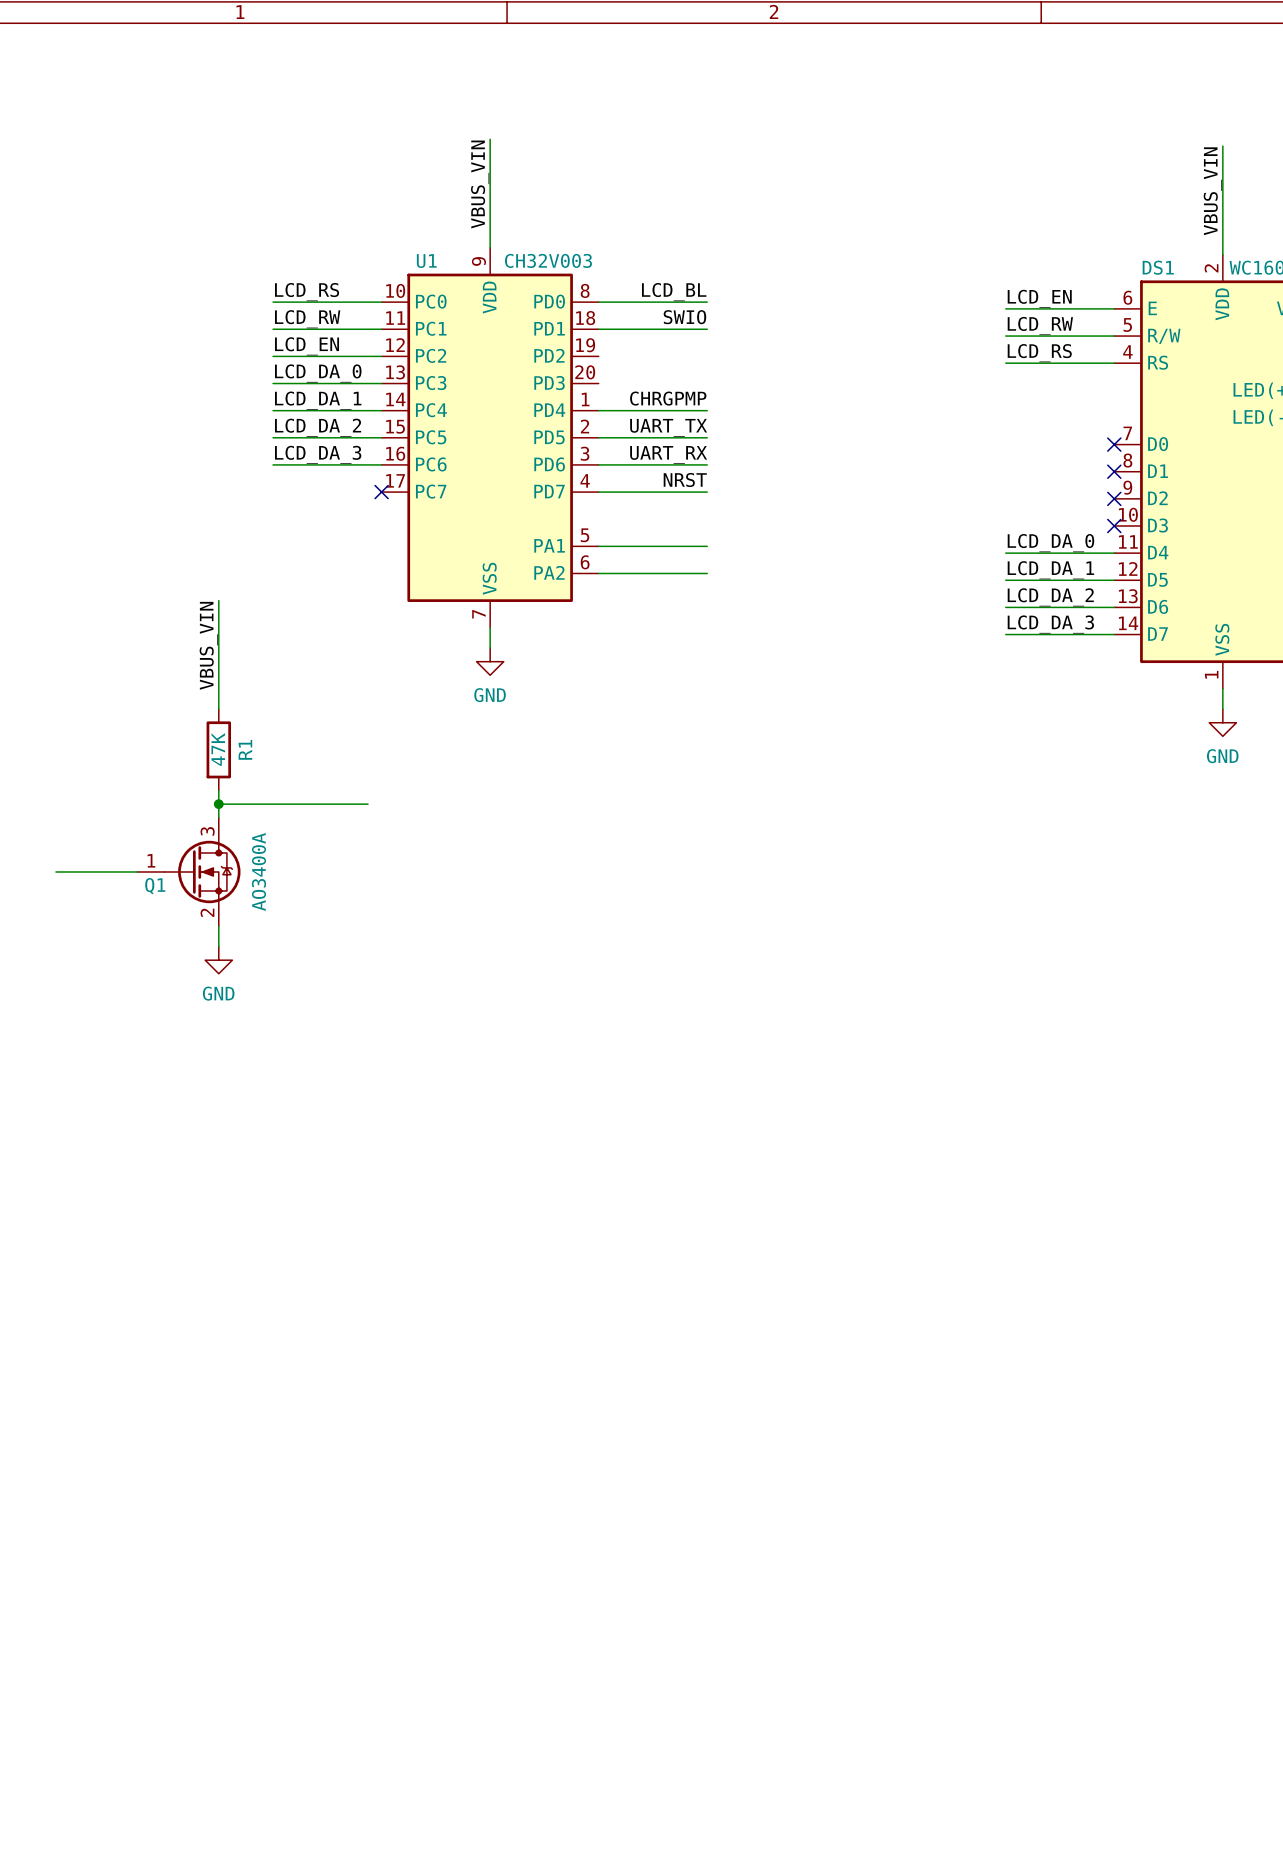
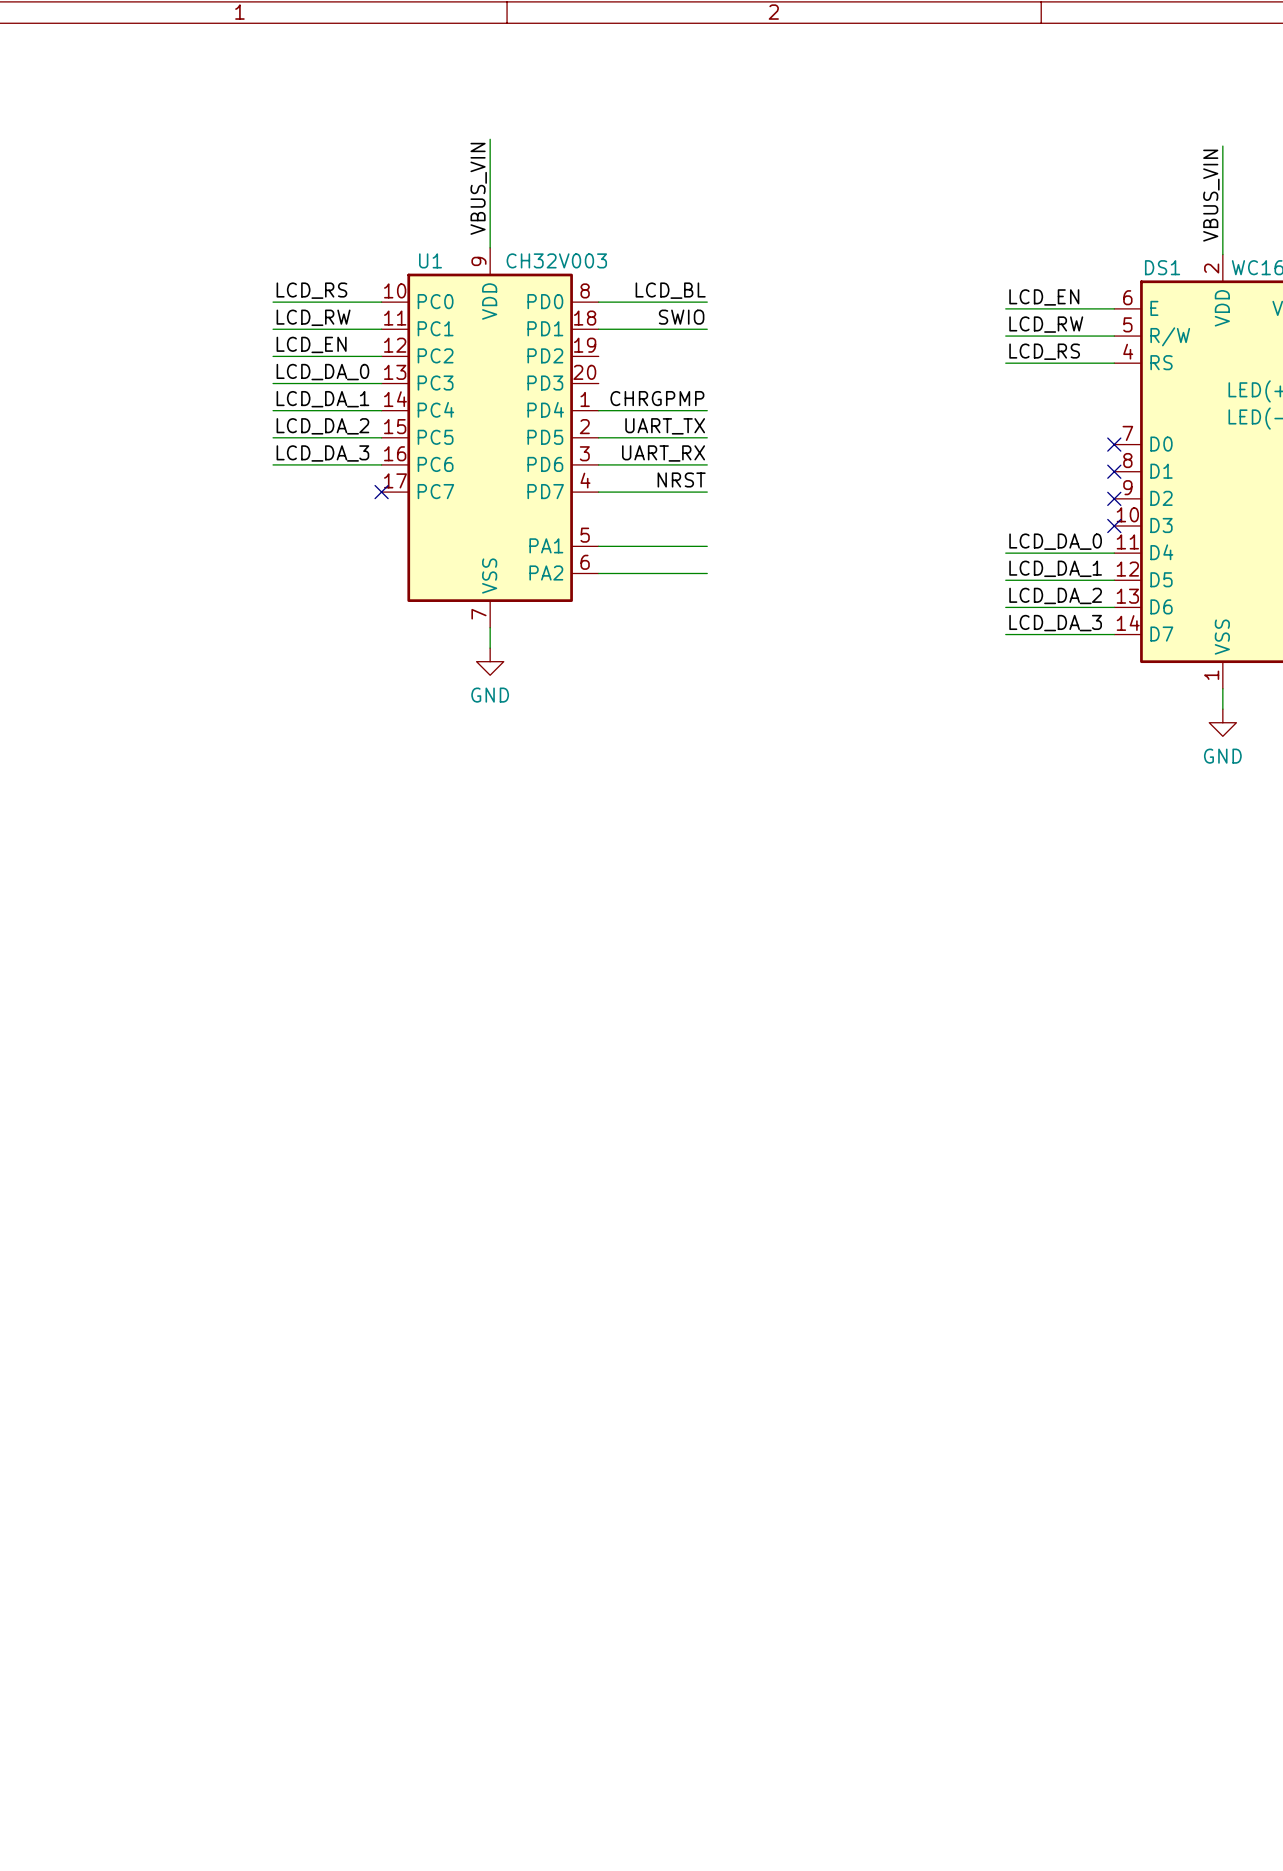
wire: (218, 600) (218, 709) -> none
label: VBUS_VIN (208, 645) -> none
R1: 47K (218, 749) -> none
wire: (218, 790) (218, 817) -> none
wire: (218, 804) (368, 804) -> none
junction: (218, 804) -> none
wire: (55, 871) (137, 871) -> none
Q1: AO3400A (188, 871) -> none
wire: (218, 926) (218, 946) -> none
power symbol: GND (218, 960) -> none

